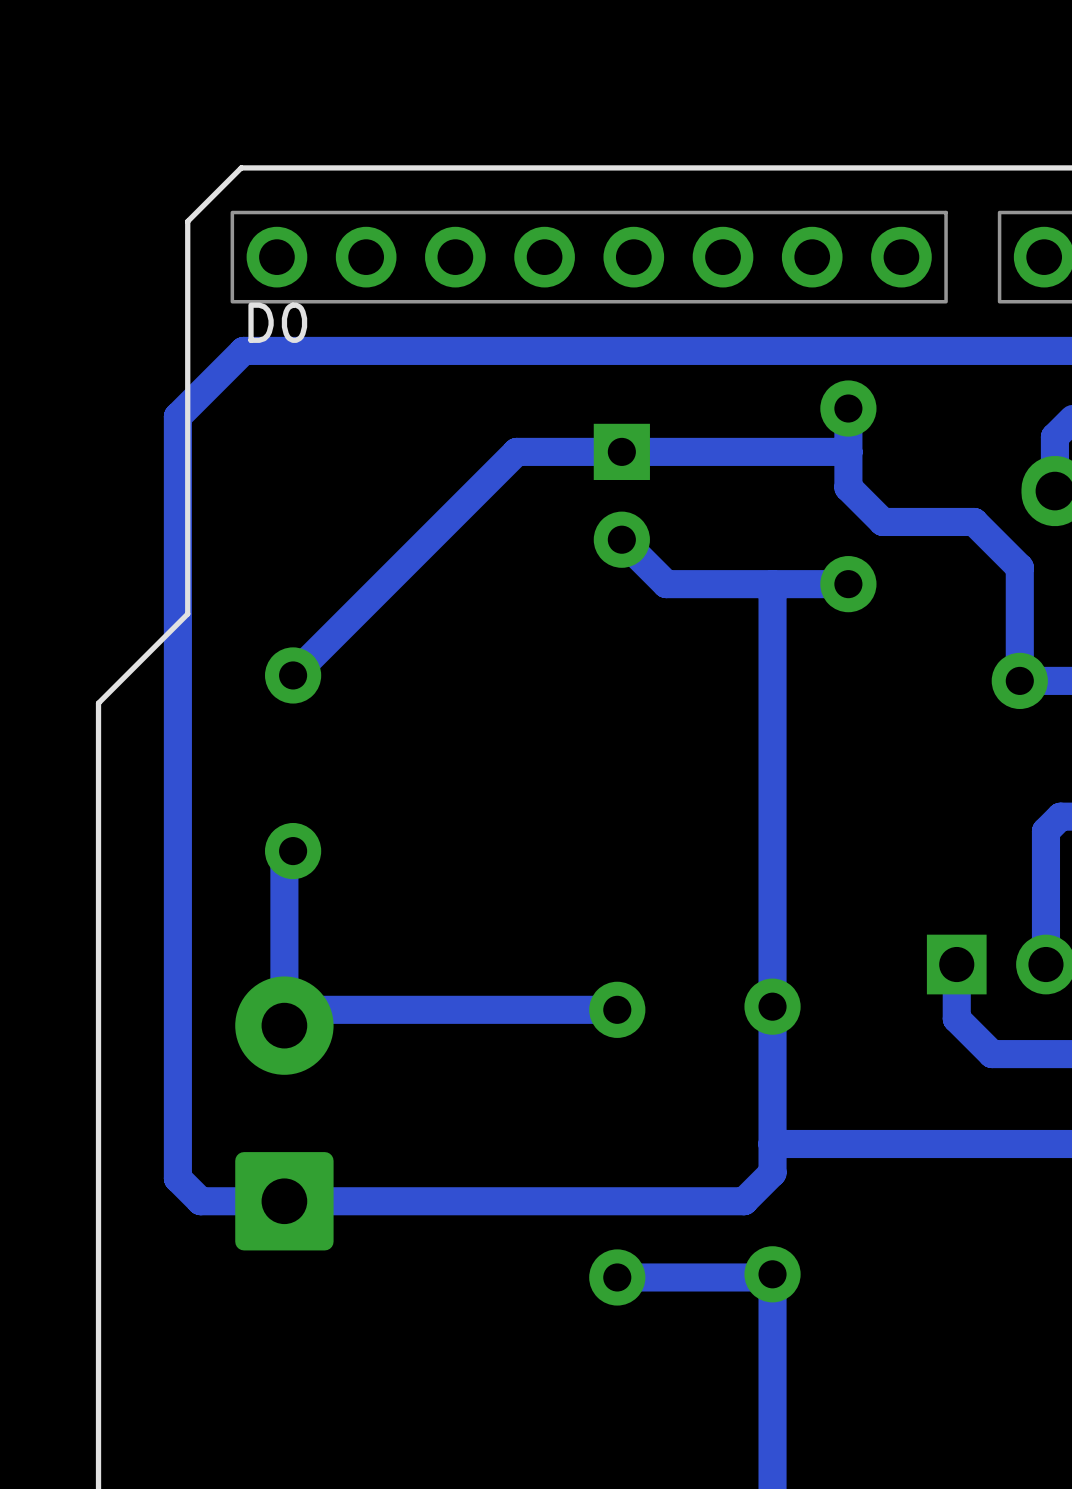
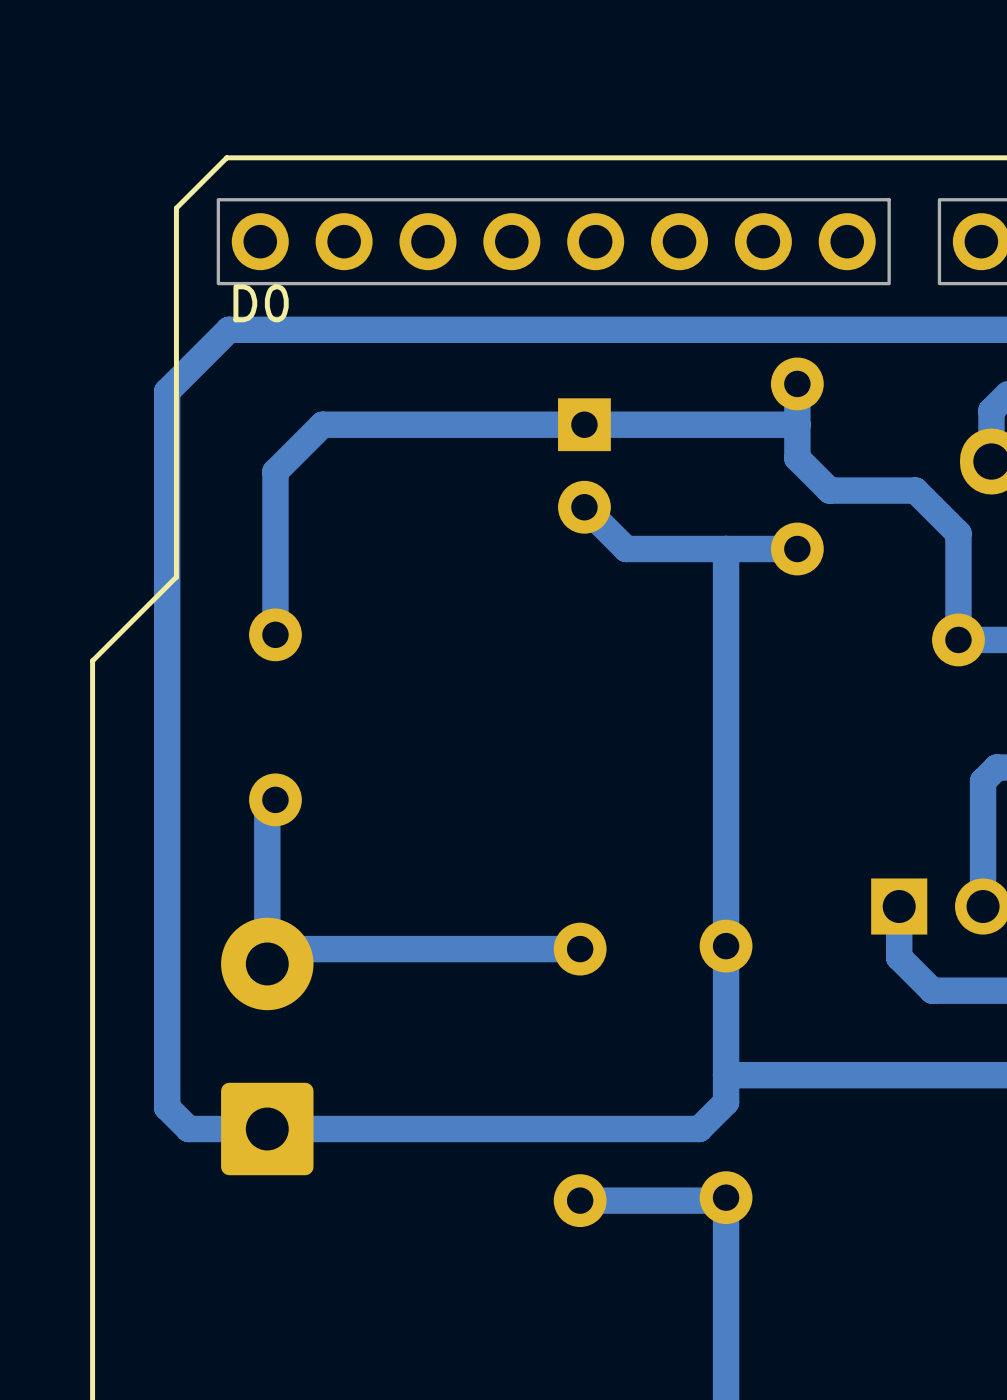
track: (516, 451) (293, 675) -> (485, 424) (322, 424) (275, 471) (275, 634)

